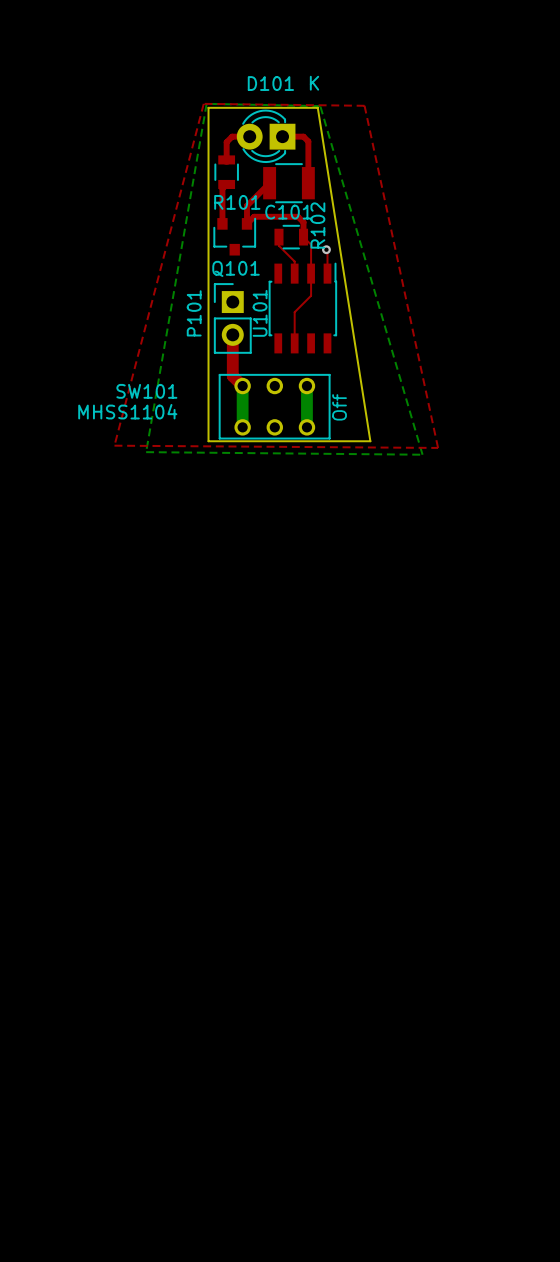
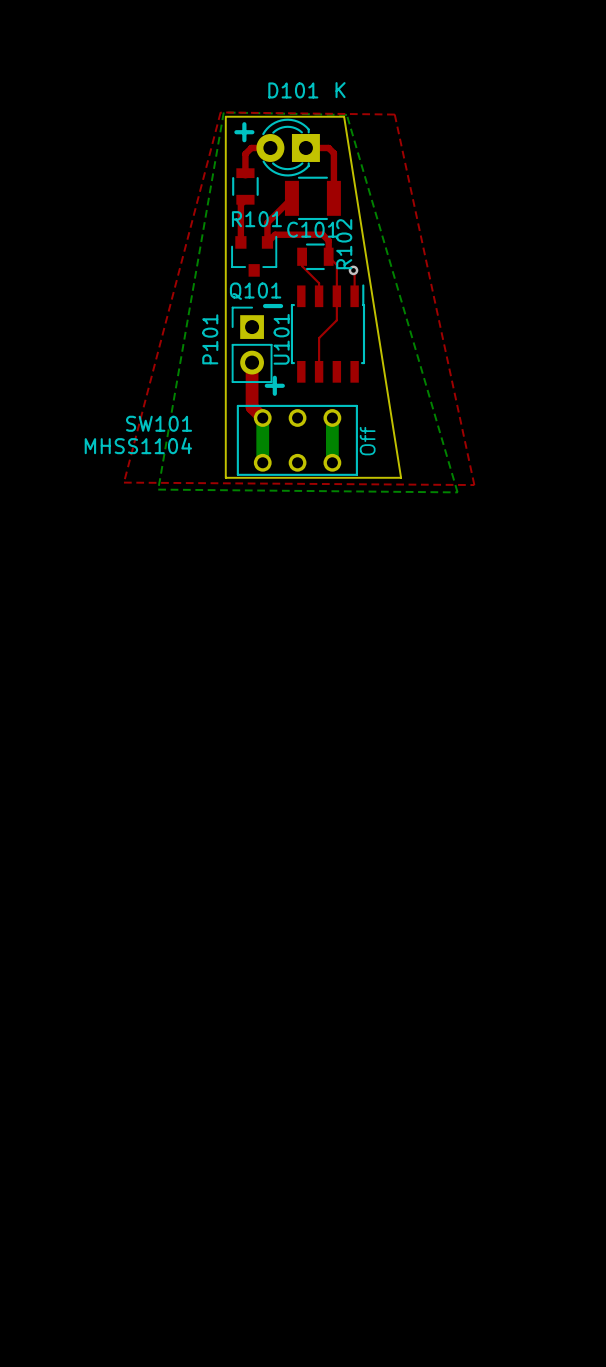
text: none -> + (244, 132)
text: none -> - (273, 306)
text: none -> + (274, 385)

